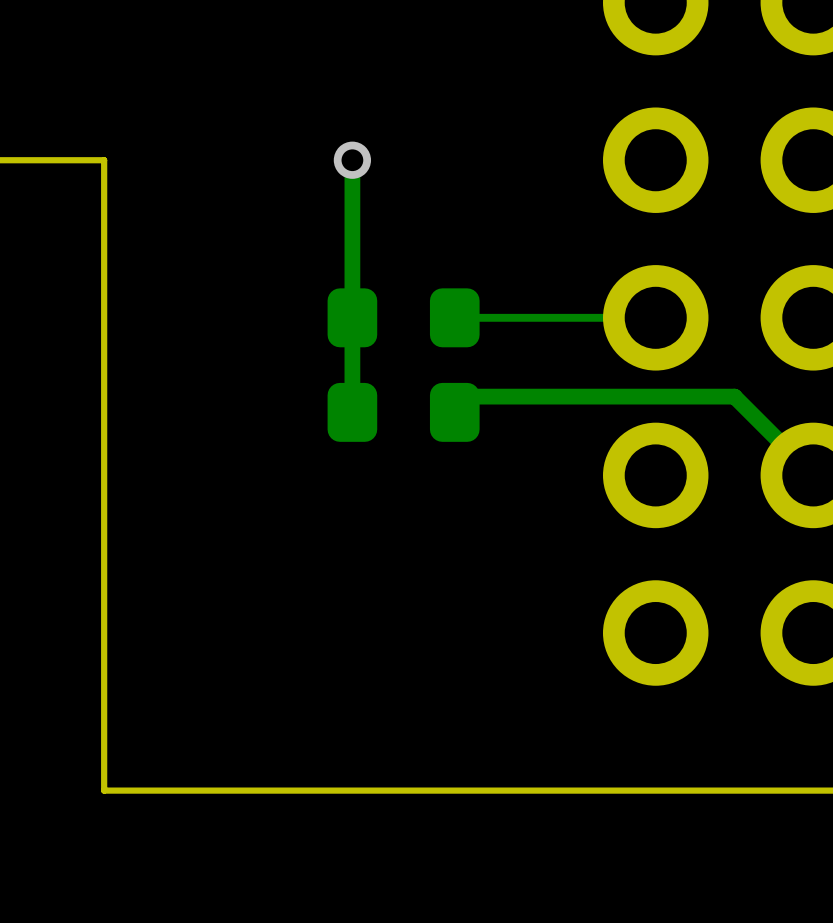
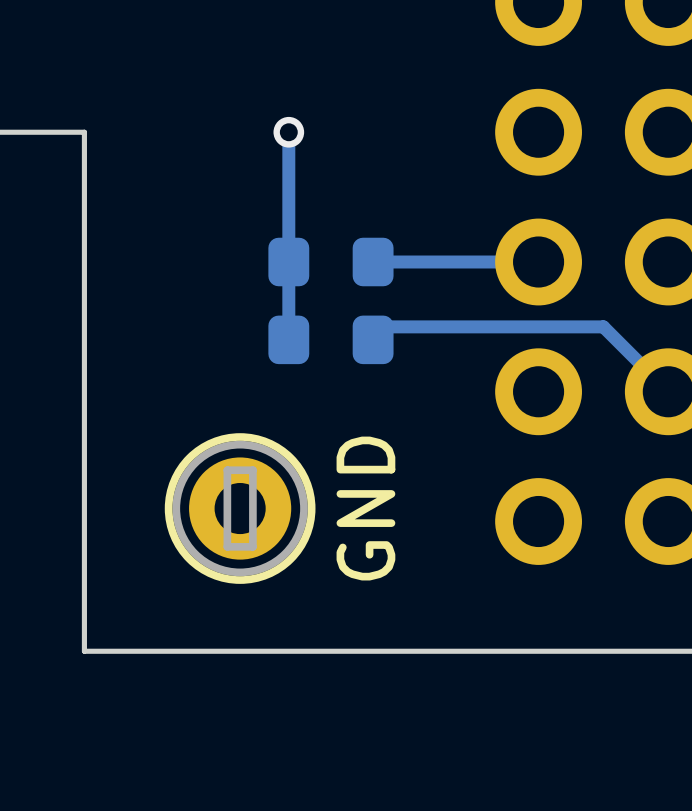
bottom track width: thin (454, 317) (655, 317) -> thick (373, 262) (538, 262)
part: none -> GND (240, 508)

